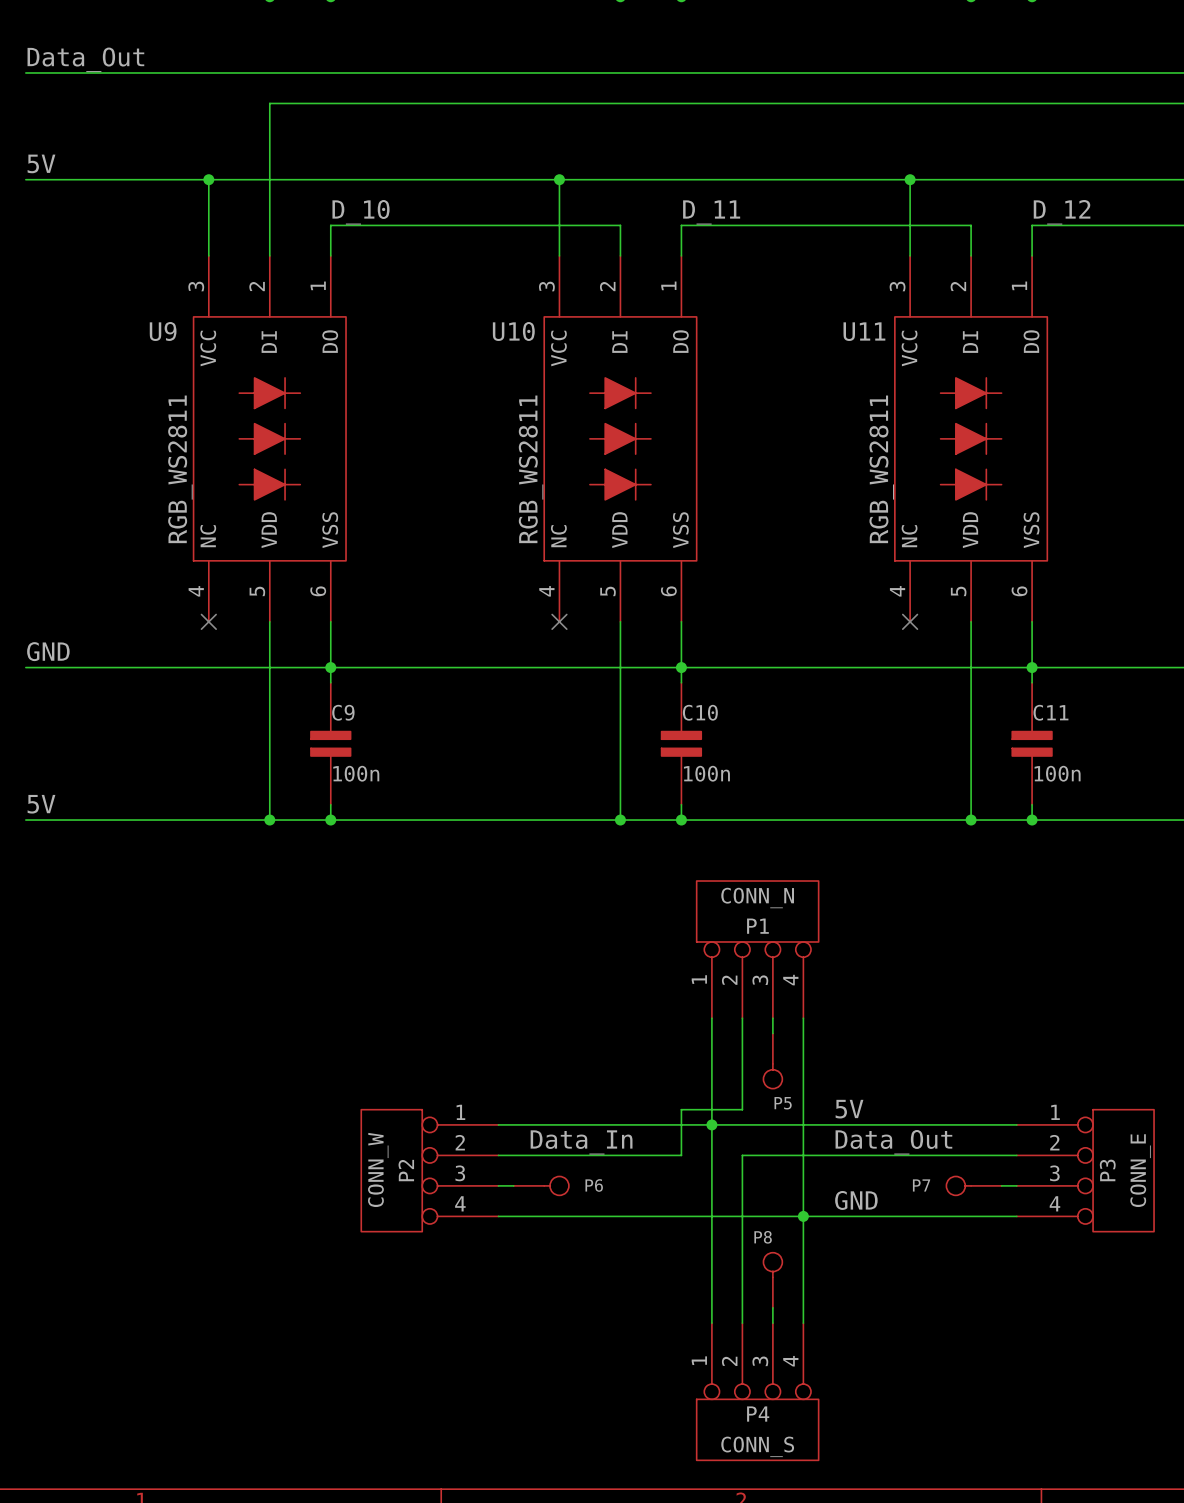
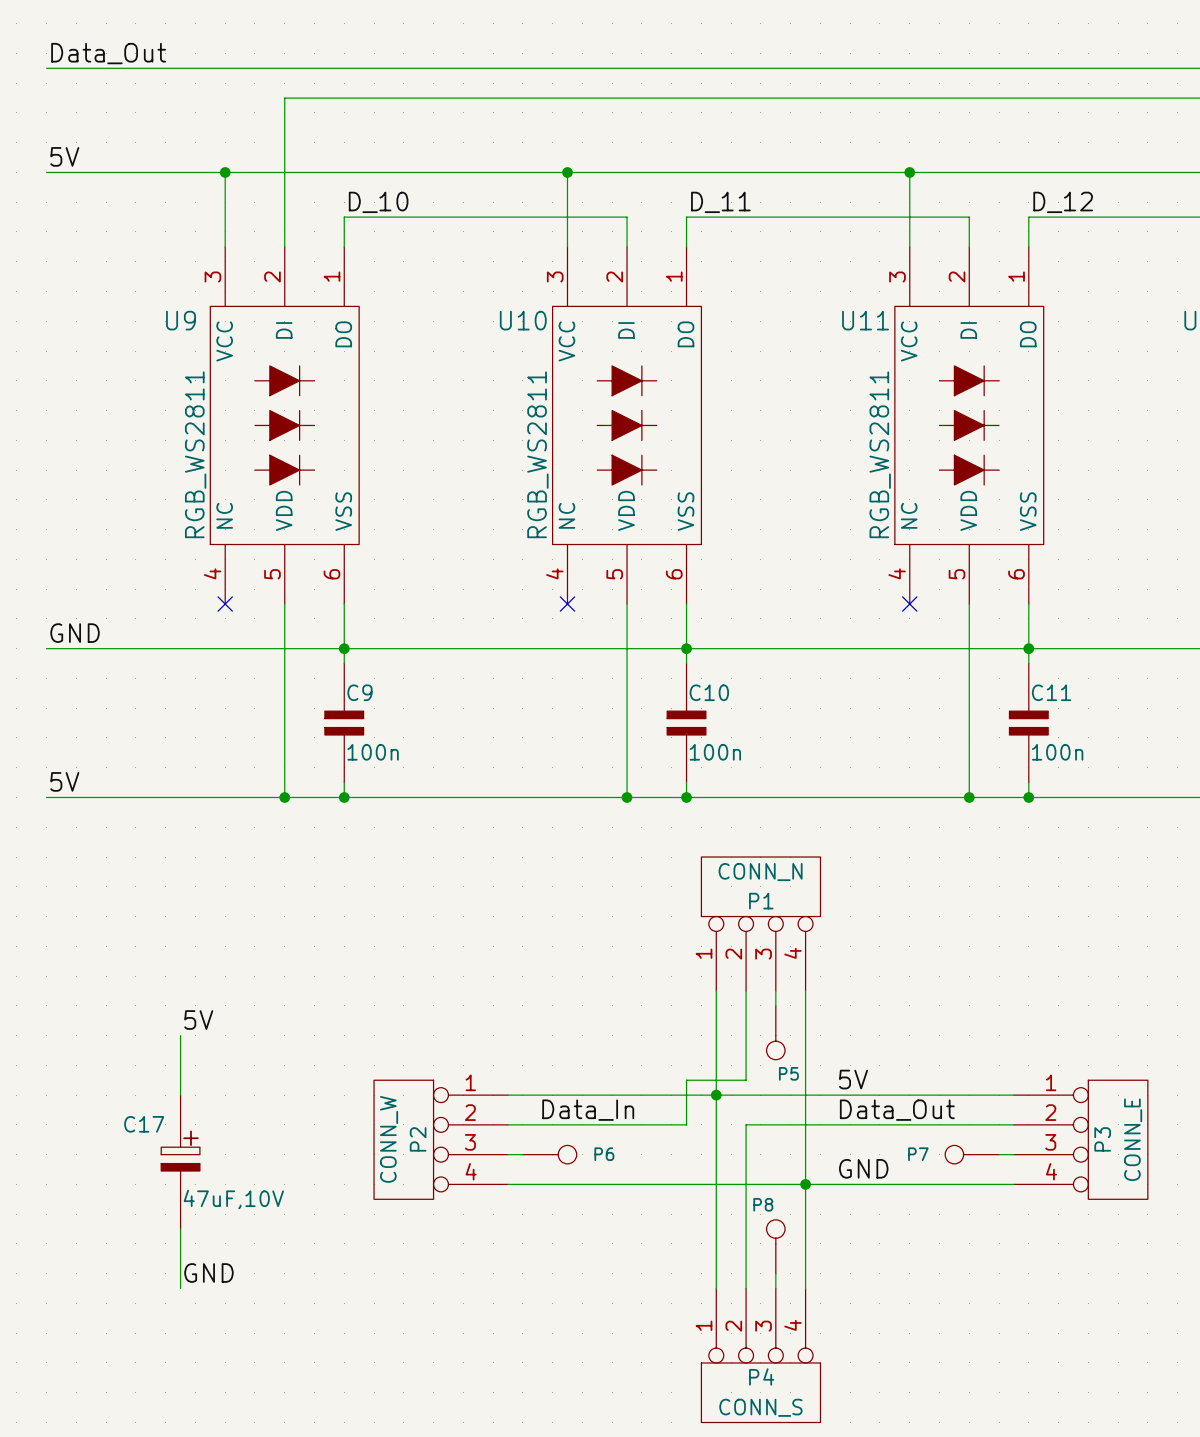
label: none -> 5V (198, 1020)
wire: none -> (180, 1035) (180, 1095)
C17: none -> 47uF,10V (180, 1162)
wire: none -> (180, 1229) (180, 1288)
label: none -> GND (208, 1272)

